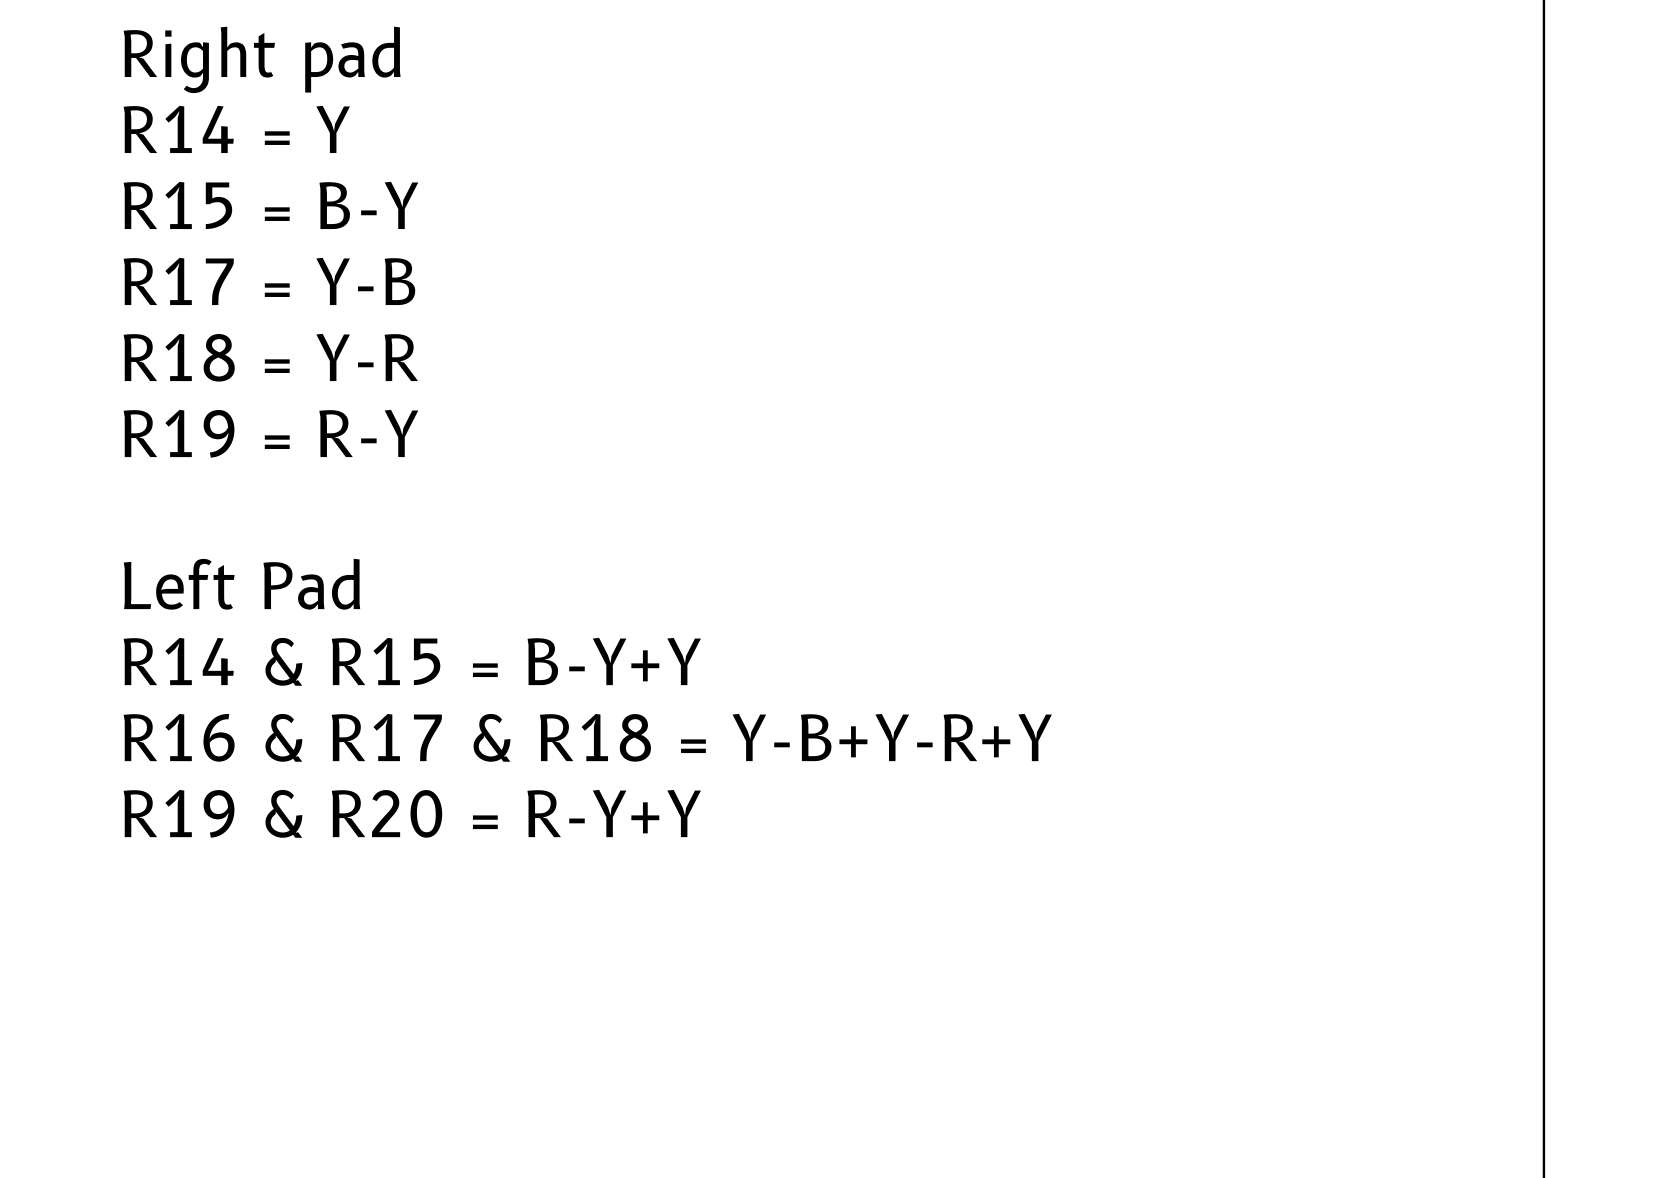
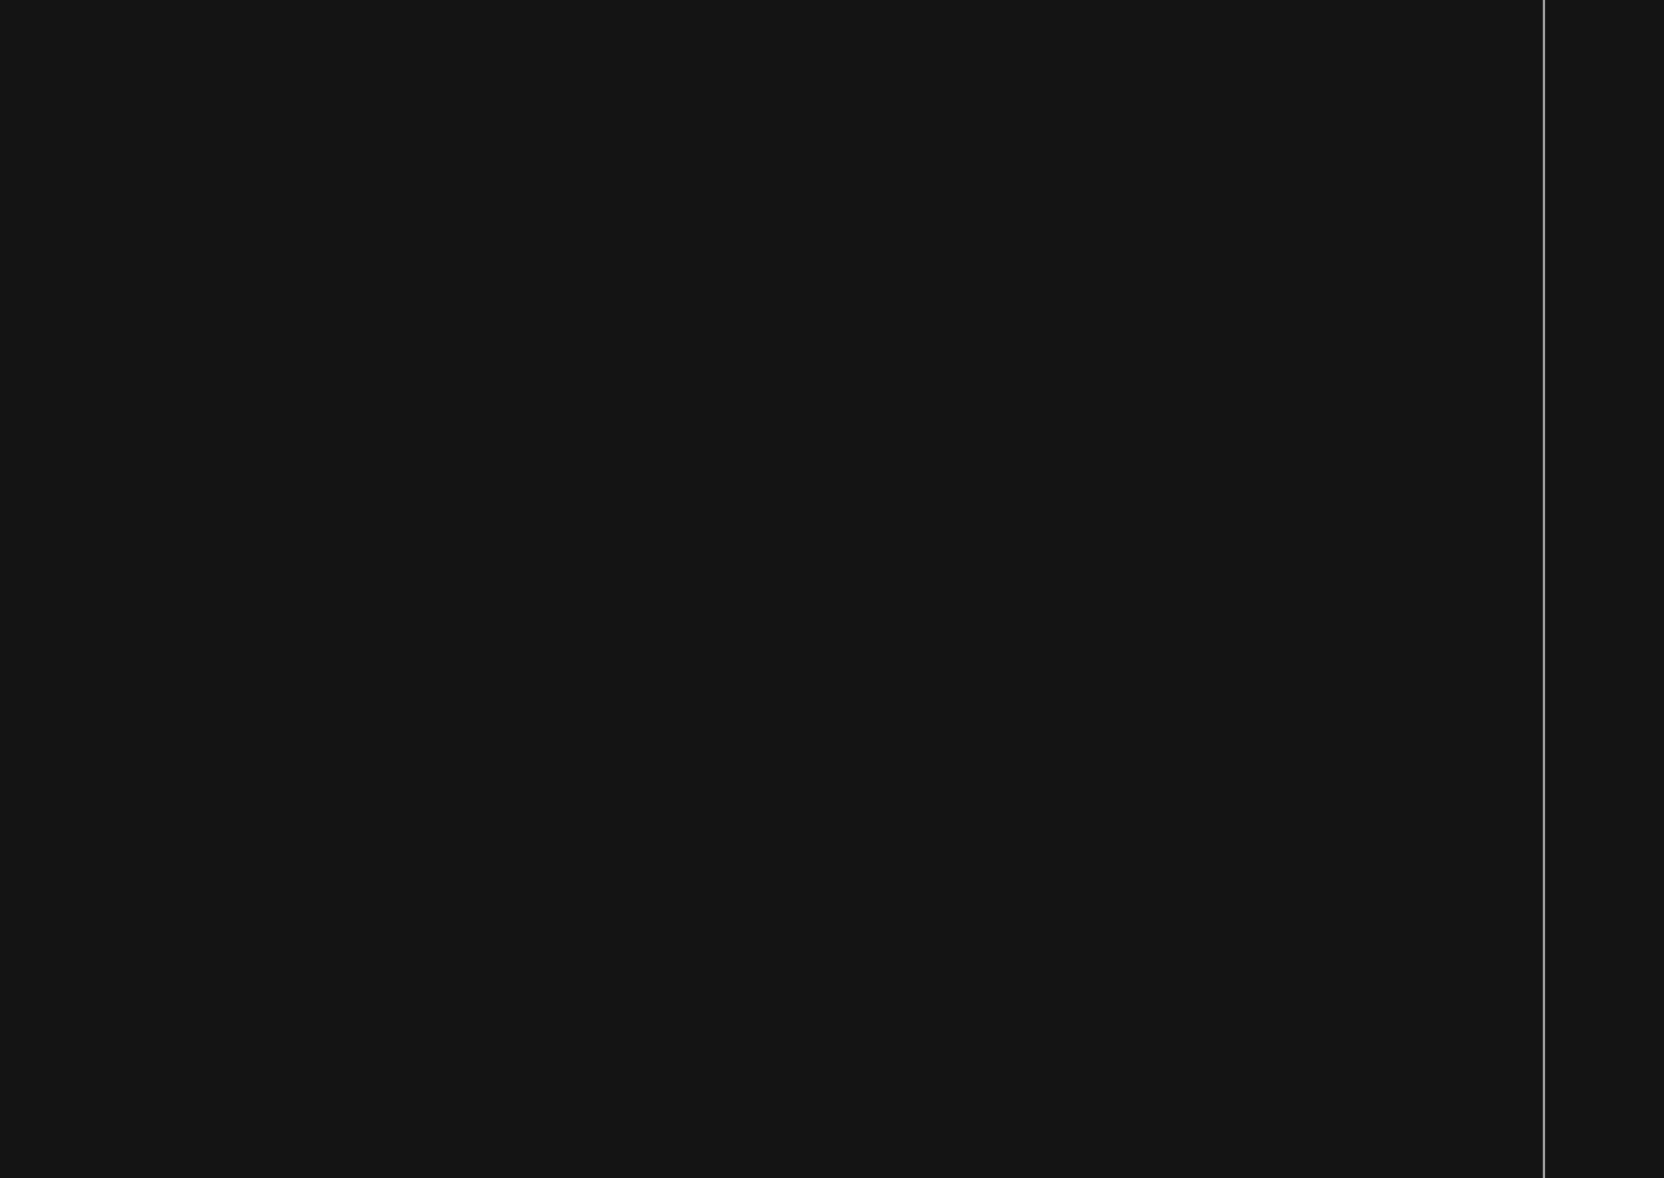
text: Right pad (262, 59) -> none
text: R14 = Y (236, 129) -> none
text: R15 = B-Y (270, 205) -> none
text: R17 = Y-B (269, 281) -> none
text: R18 = Y-R (270, 357) -> none
text: R19 = R-Y (270, 433) -> none
text: Left Pad (242, 584) -> none
text: R14 & R15 = B-Y+Y (412, 661) -> none
text: R16 & R17 & R18 = Y-B+Y-R+Y (587, 737) -> none
text: R19 & R20 = R-Y+Y (412, 813) -> none

